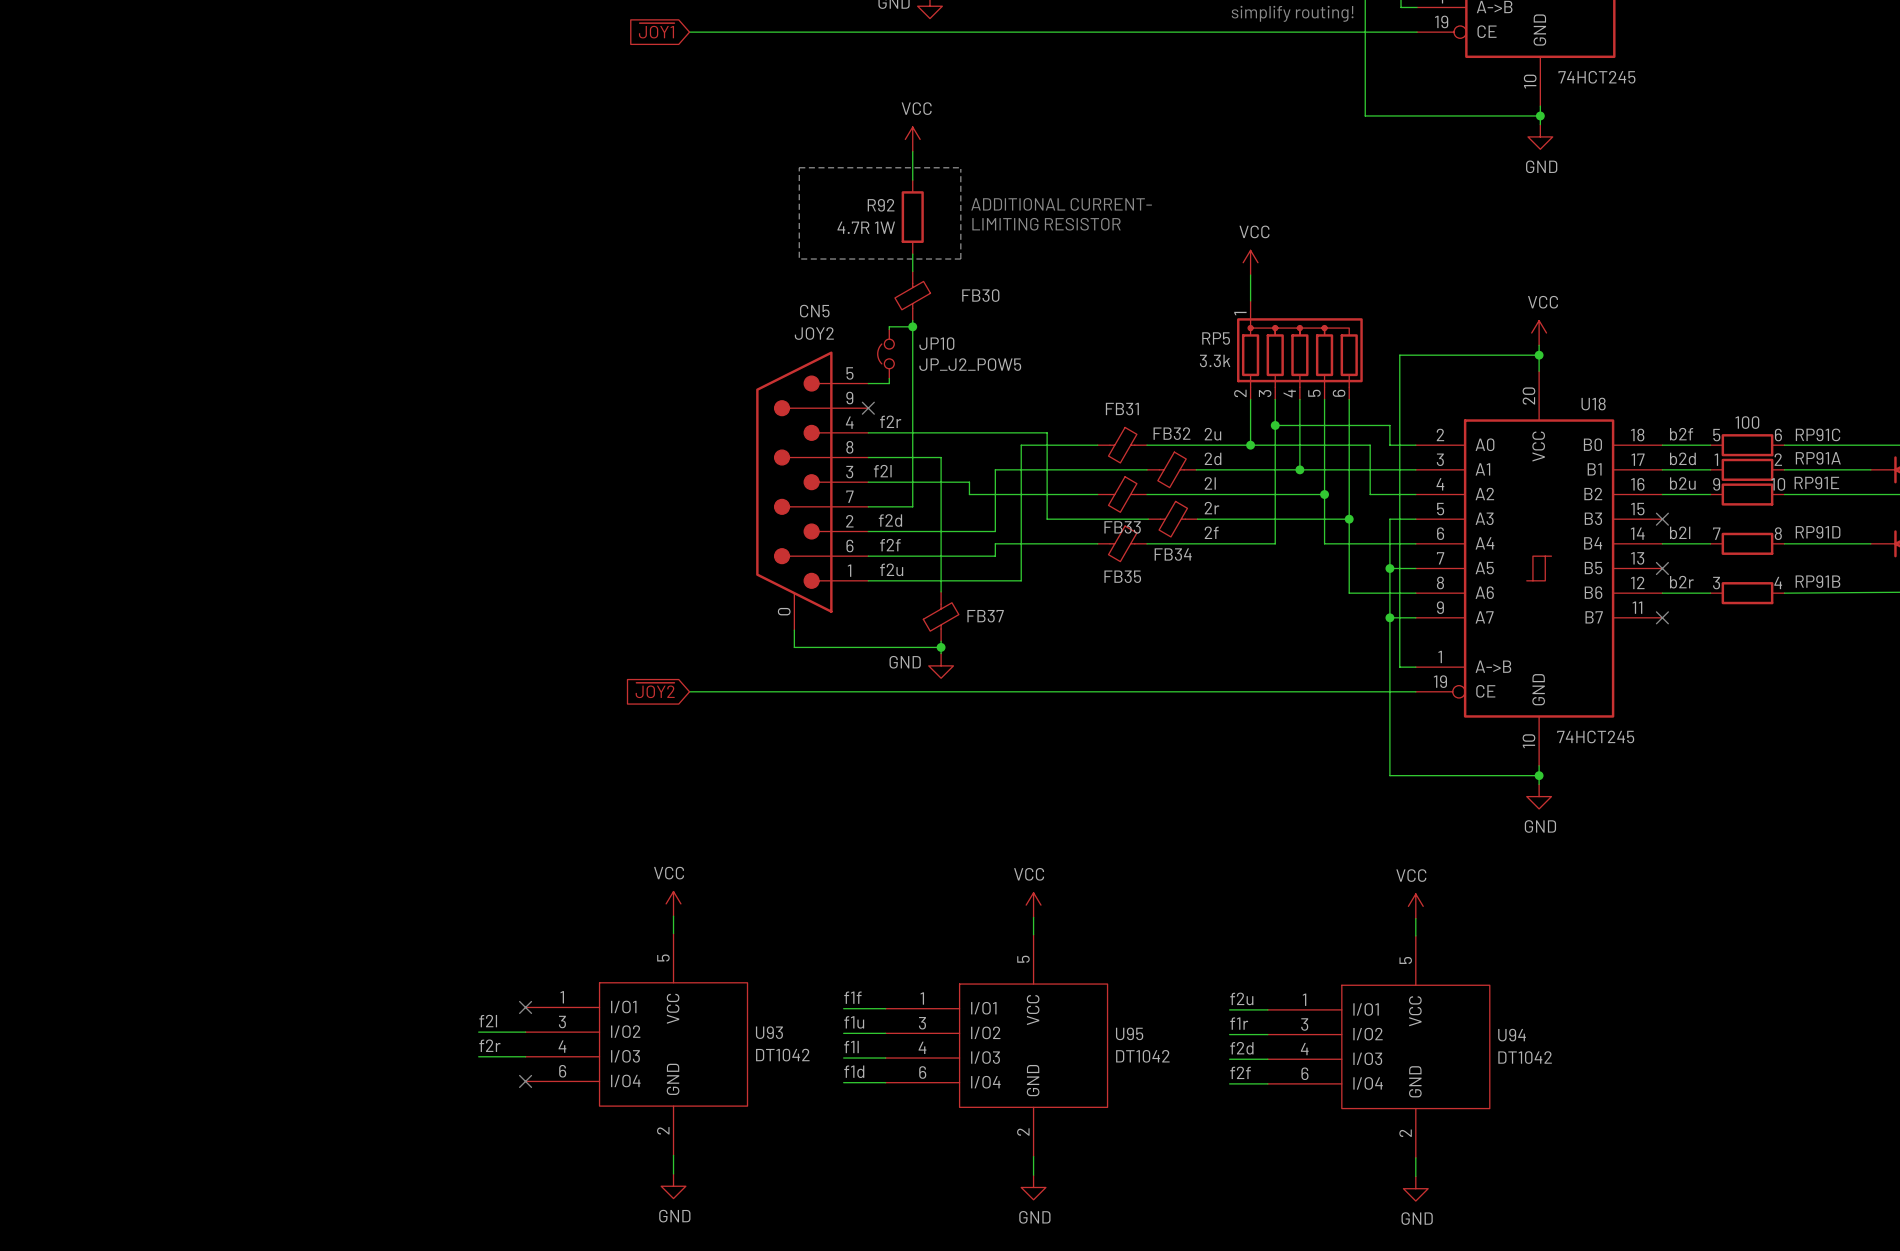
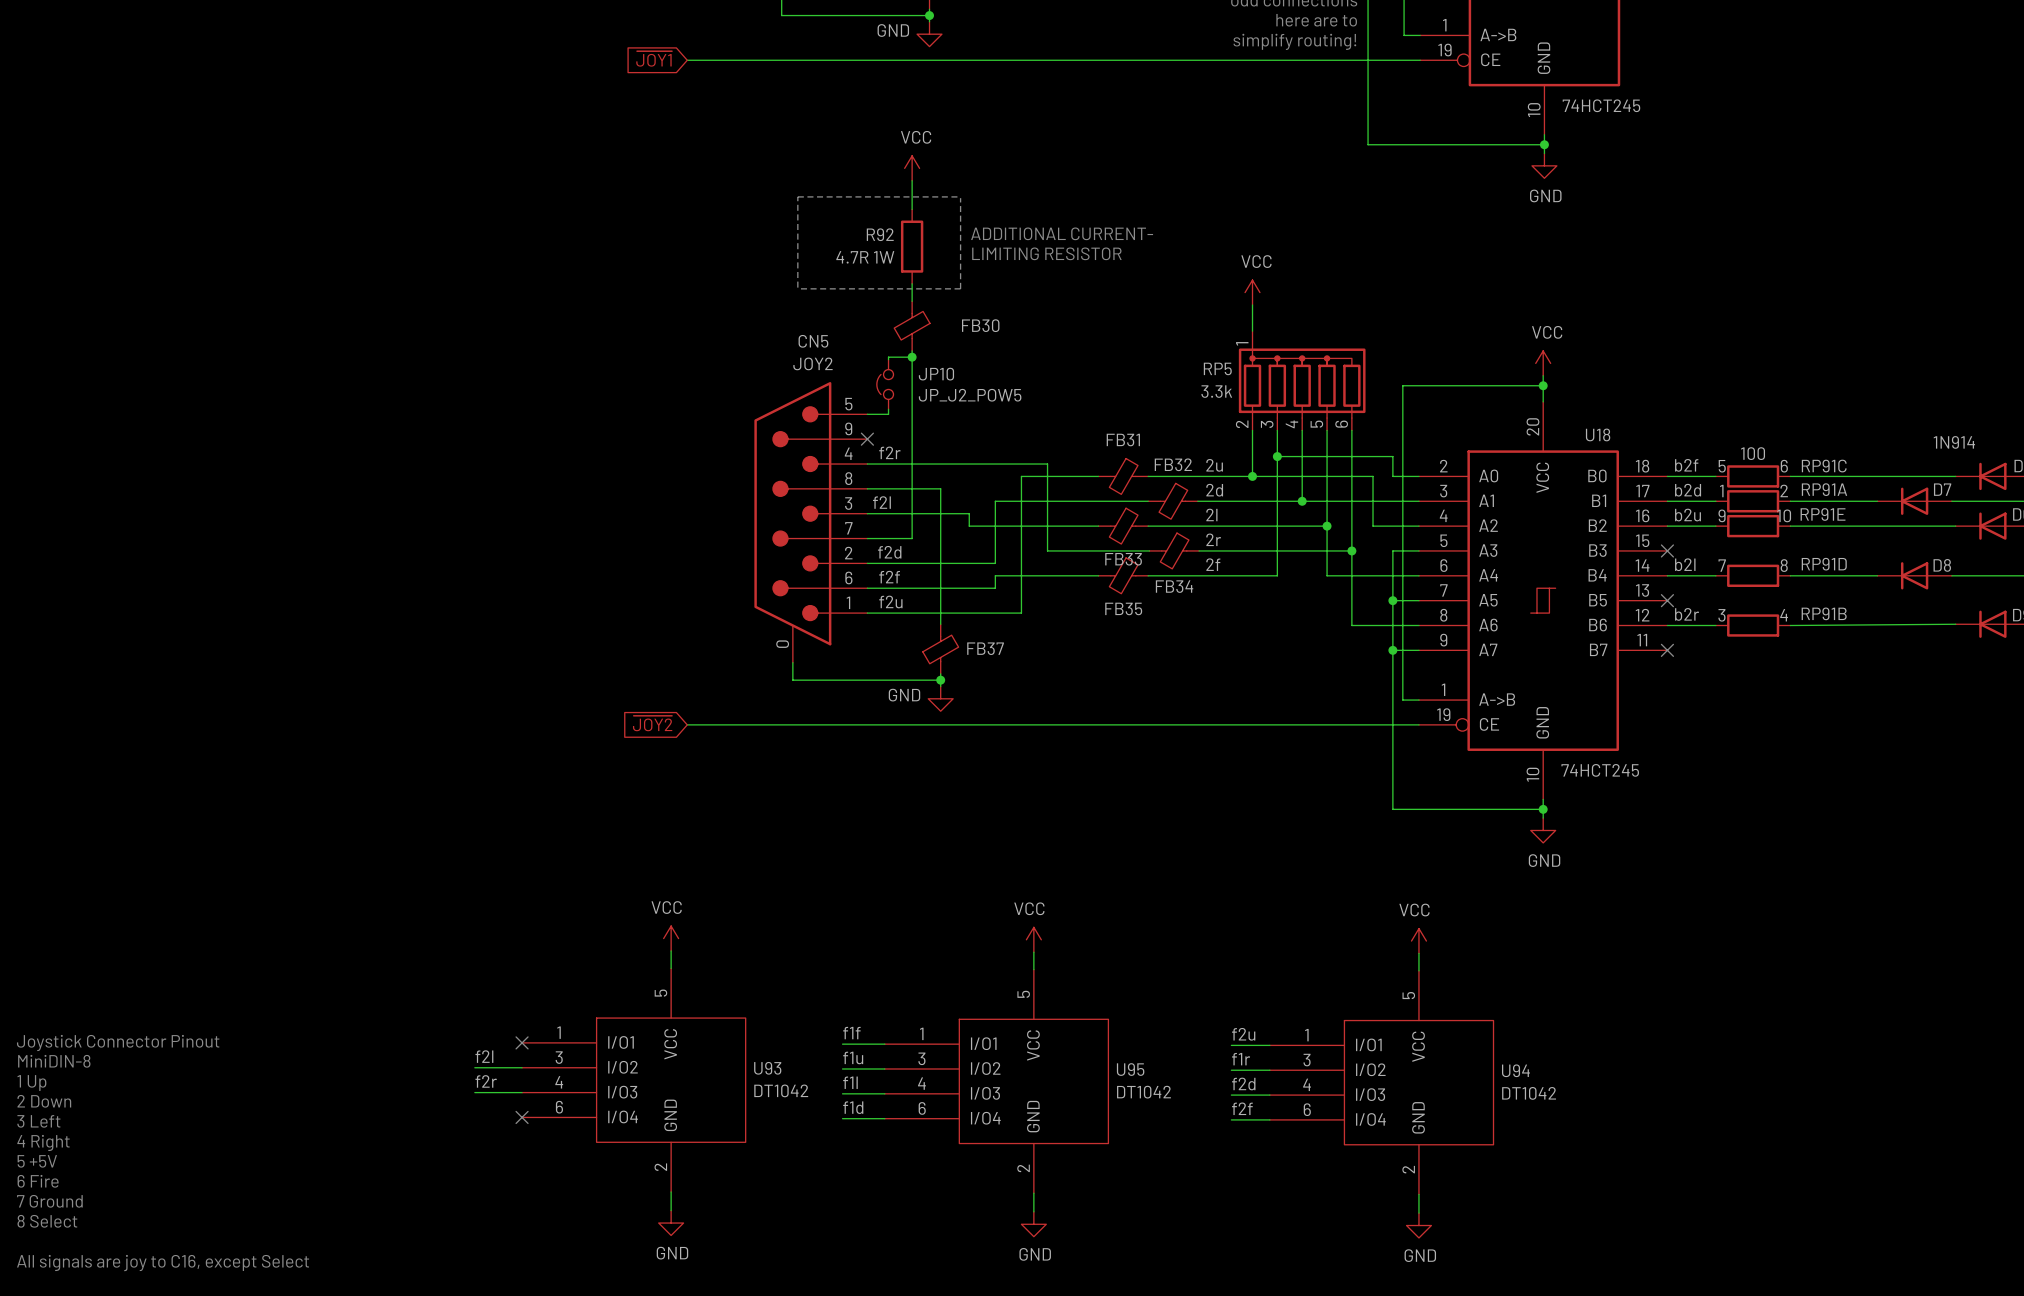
text: none -> Joystick Connector Pinout (118, 1042)
text: none -> MiniDIN-8 (54, 1061)
text: none -> 1 Up (31, 1083)
text: none -> 2 Down (44, 1101)
text: none -> 3 Left (38, 1121)
text: none -> 4 Right (43, 1142)
text: none -> 5 +5V (37, 1161)
text: none -> 6 Fire (38, 1181)
text: none -> 7 Ground (49, 1201)
text: none -> 8 Select (47, 1221)
text: none -> All signals are joy to C16, except Select (163, 1263)

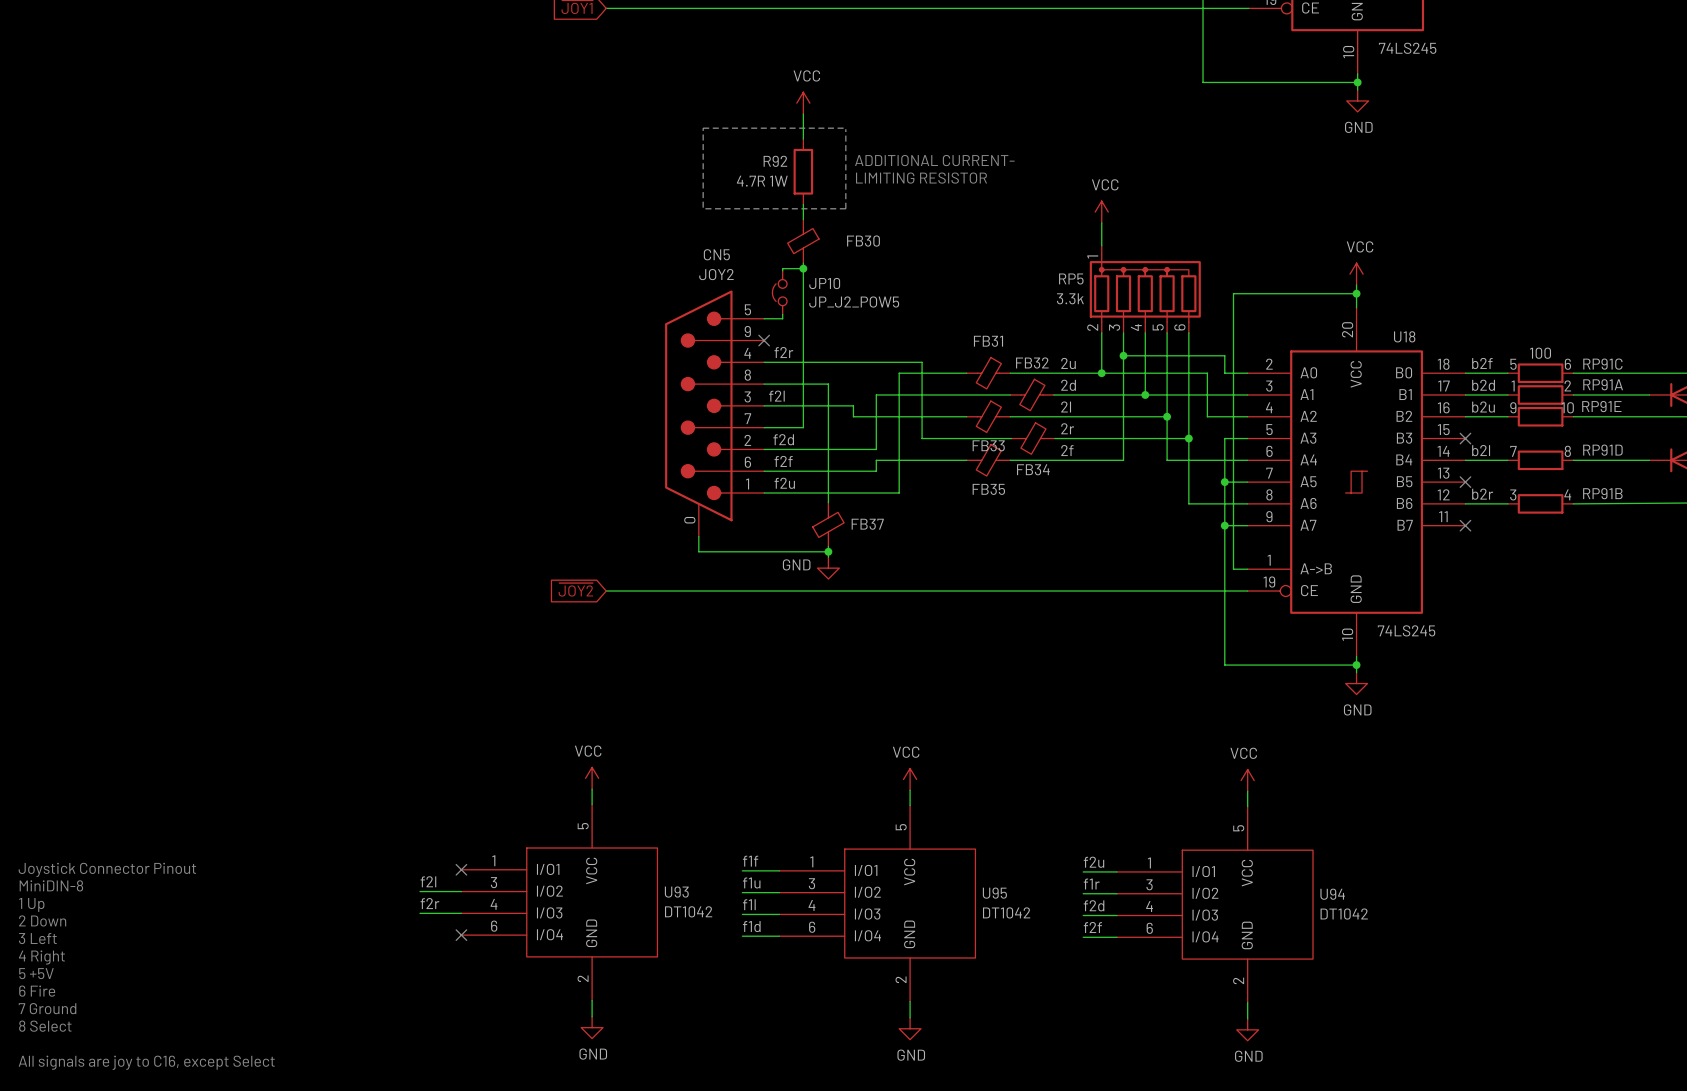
part value: 74HCT245 (1601, 105) -> 74LS245 (1407, 48)
U18 value: 74HCT245 (1600, 770) -> 74LS245 (1406, 630)

